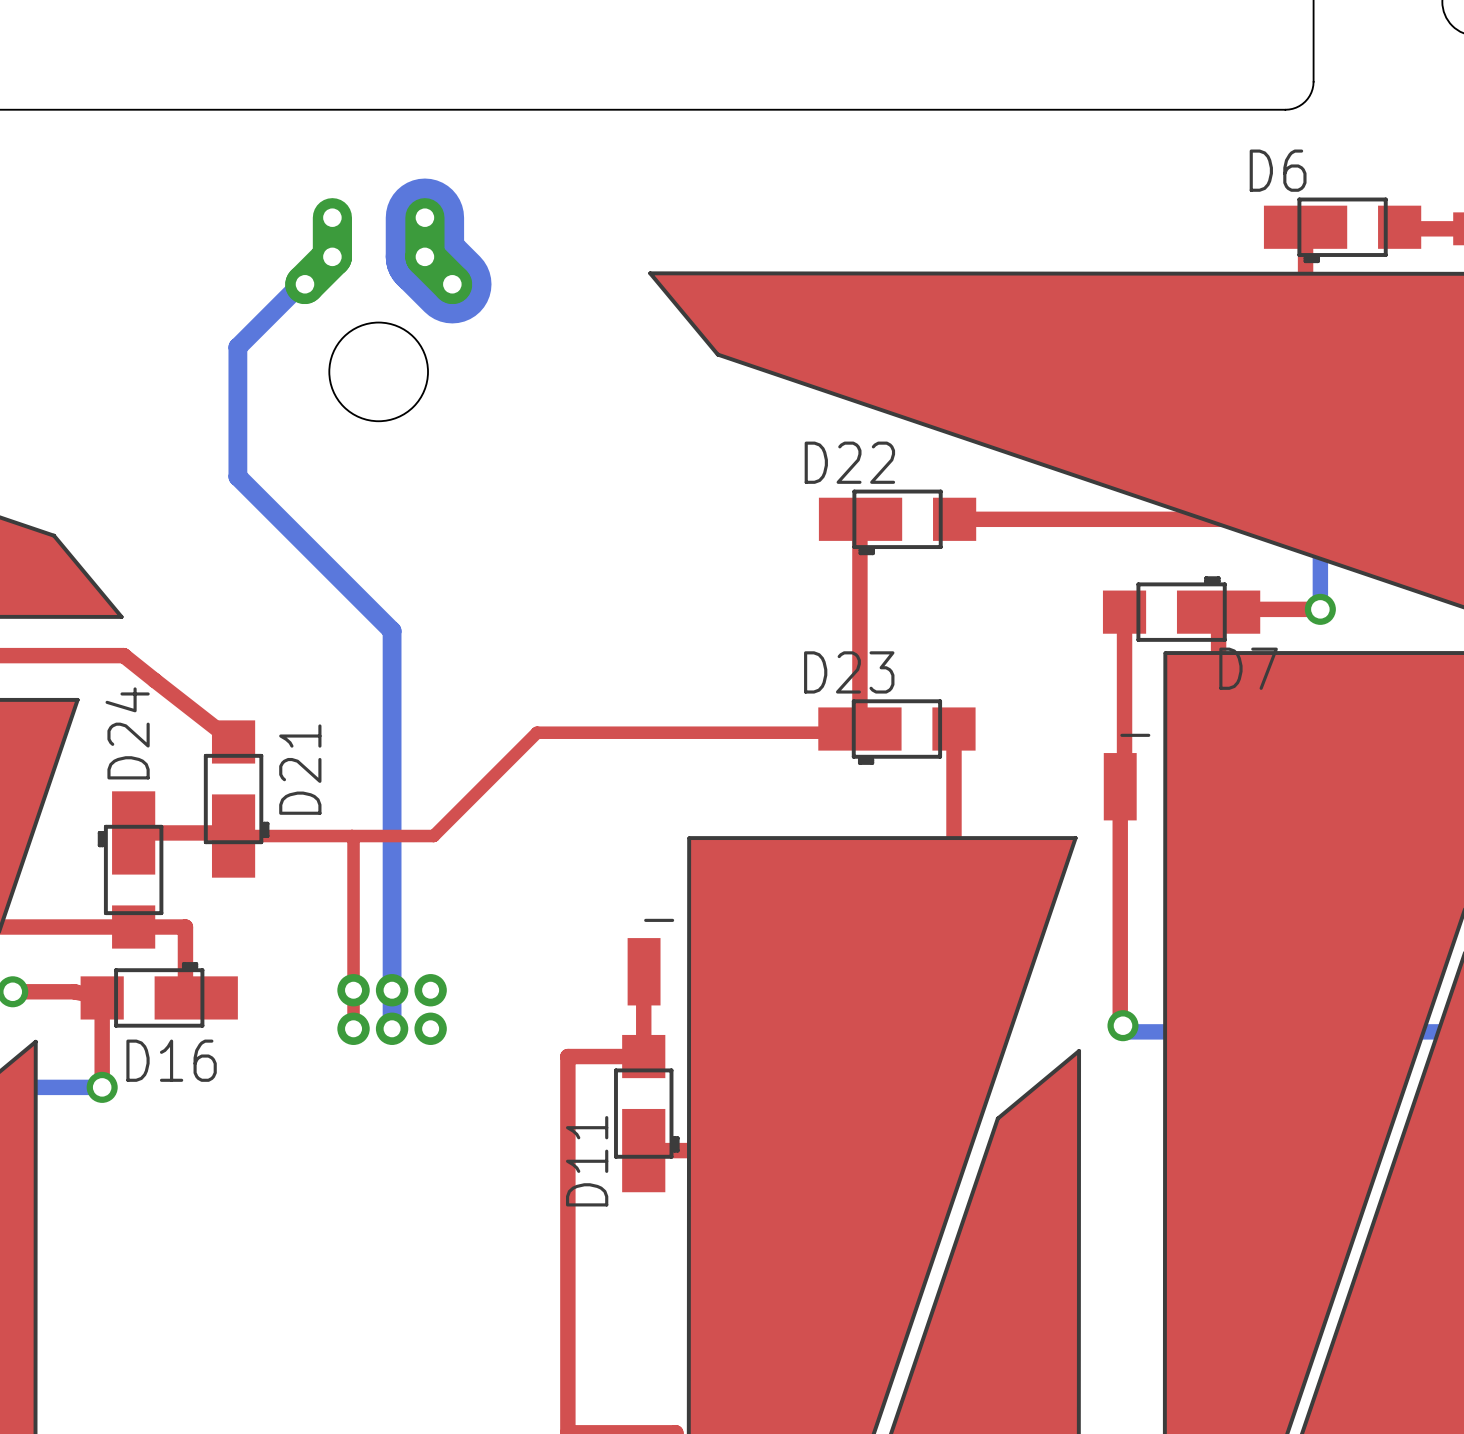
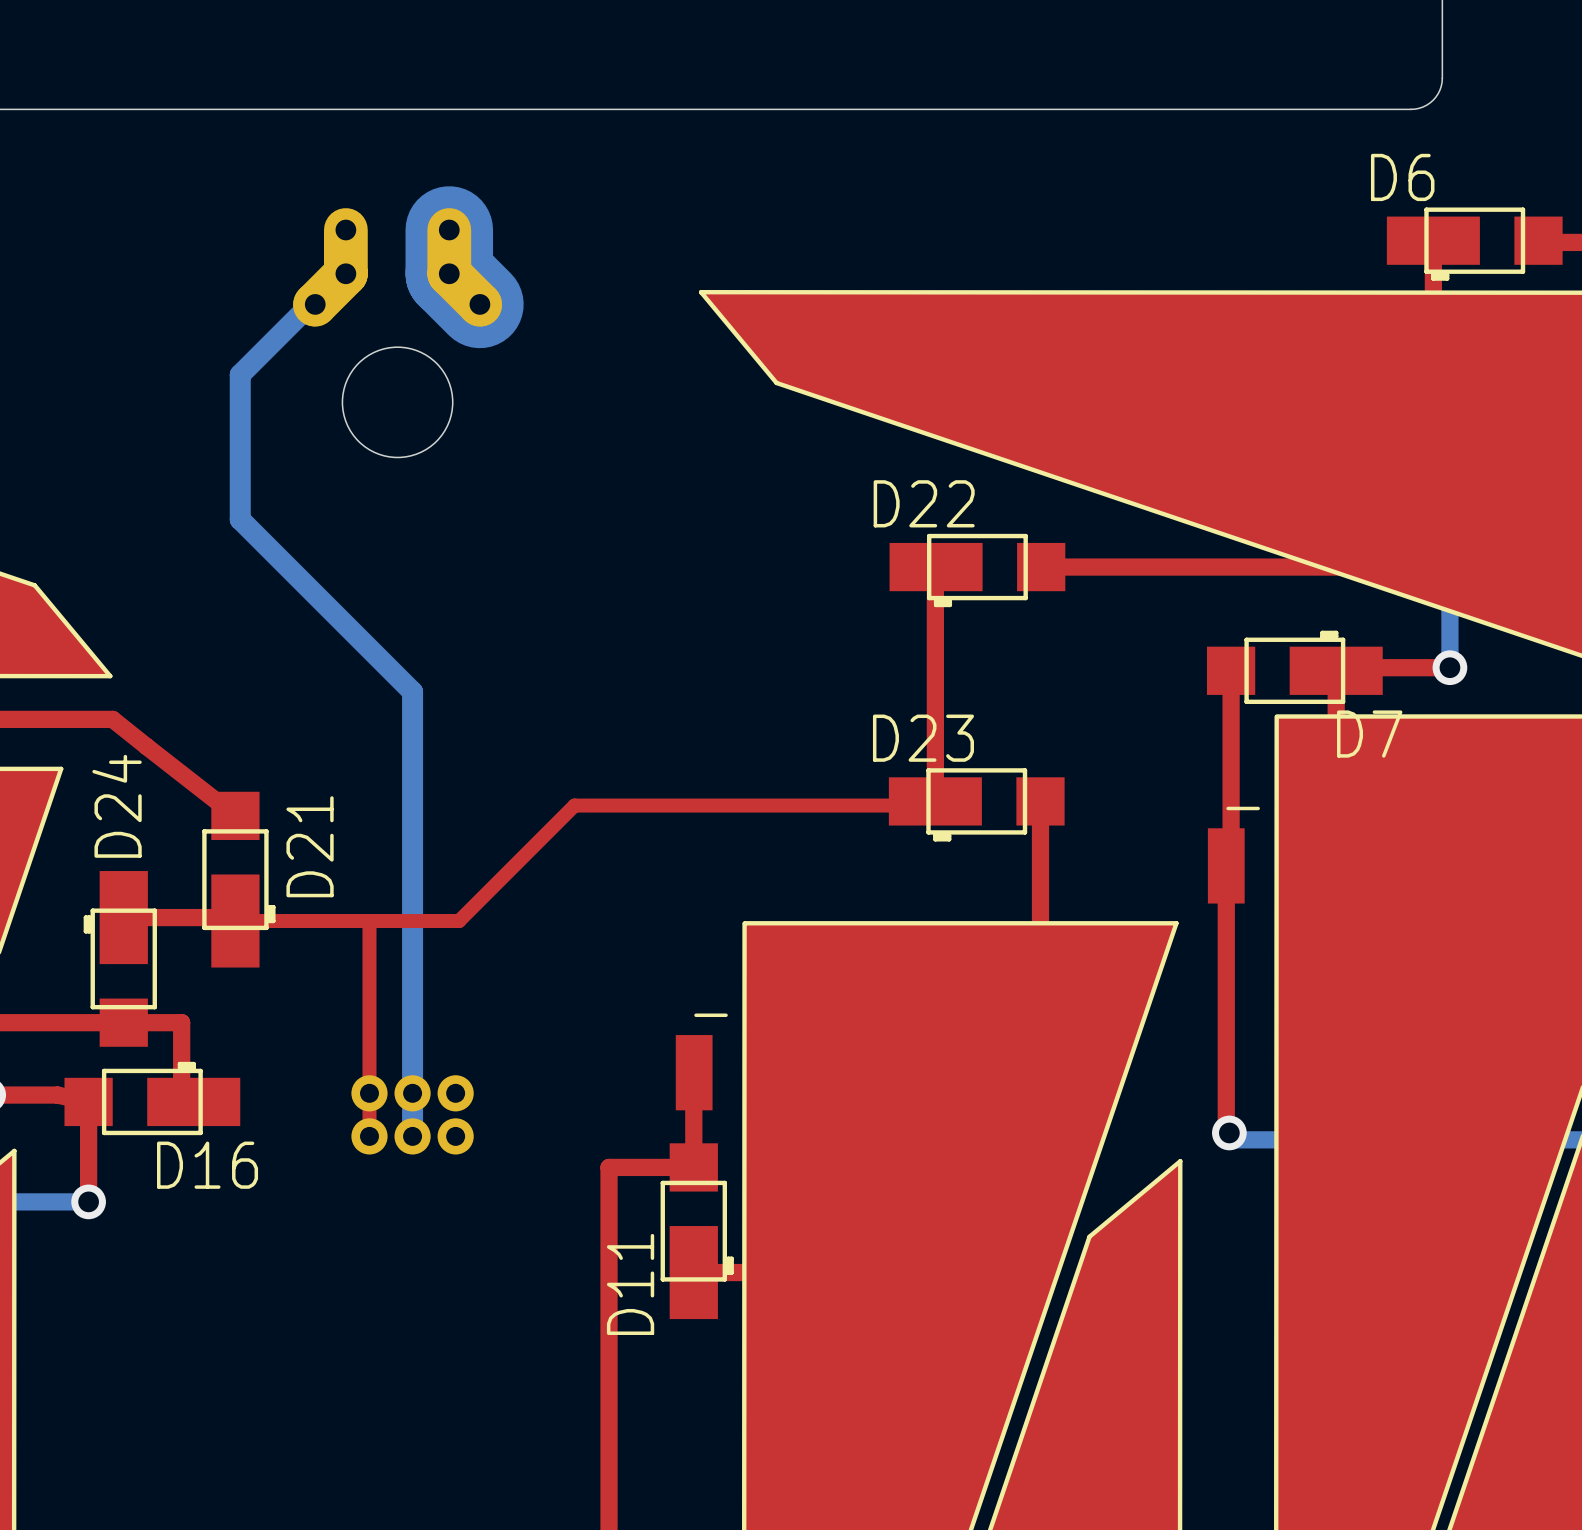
D16 name position: D16 (171, 1060) -> D16 (207, 1165)

